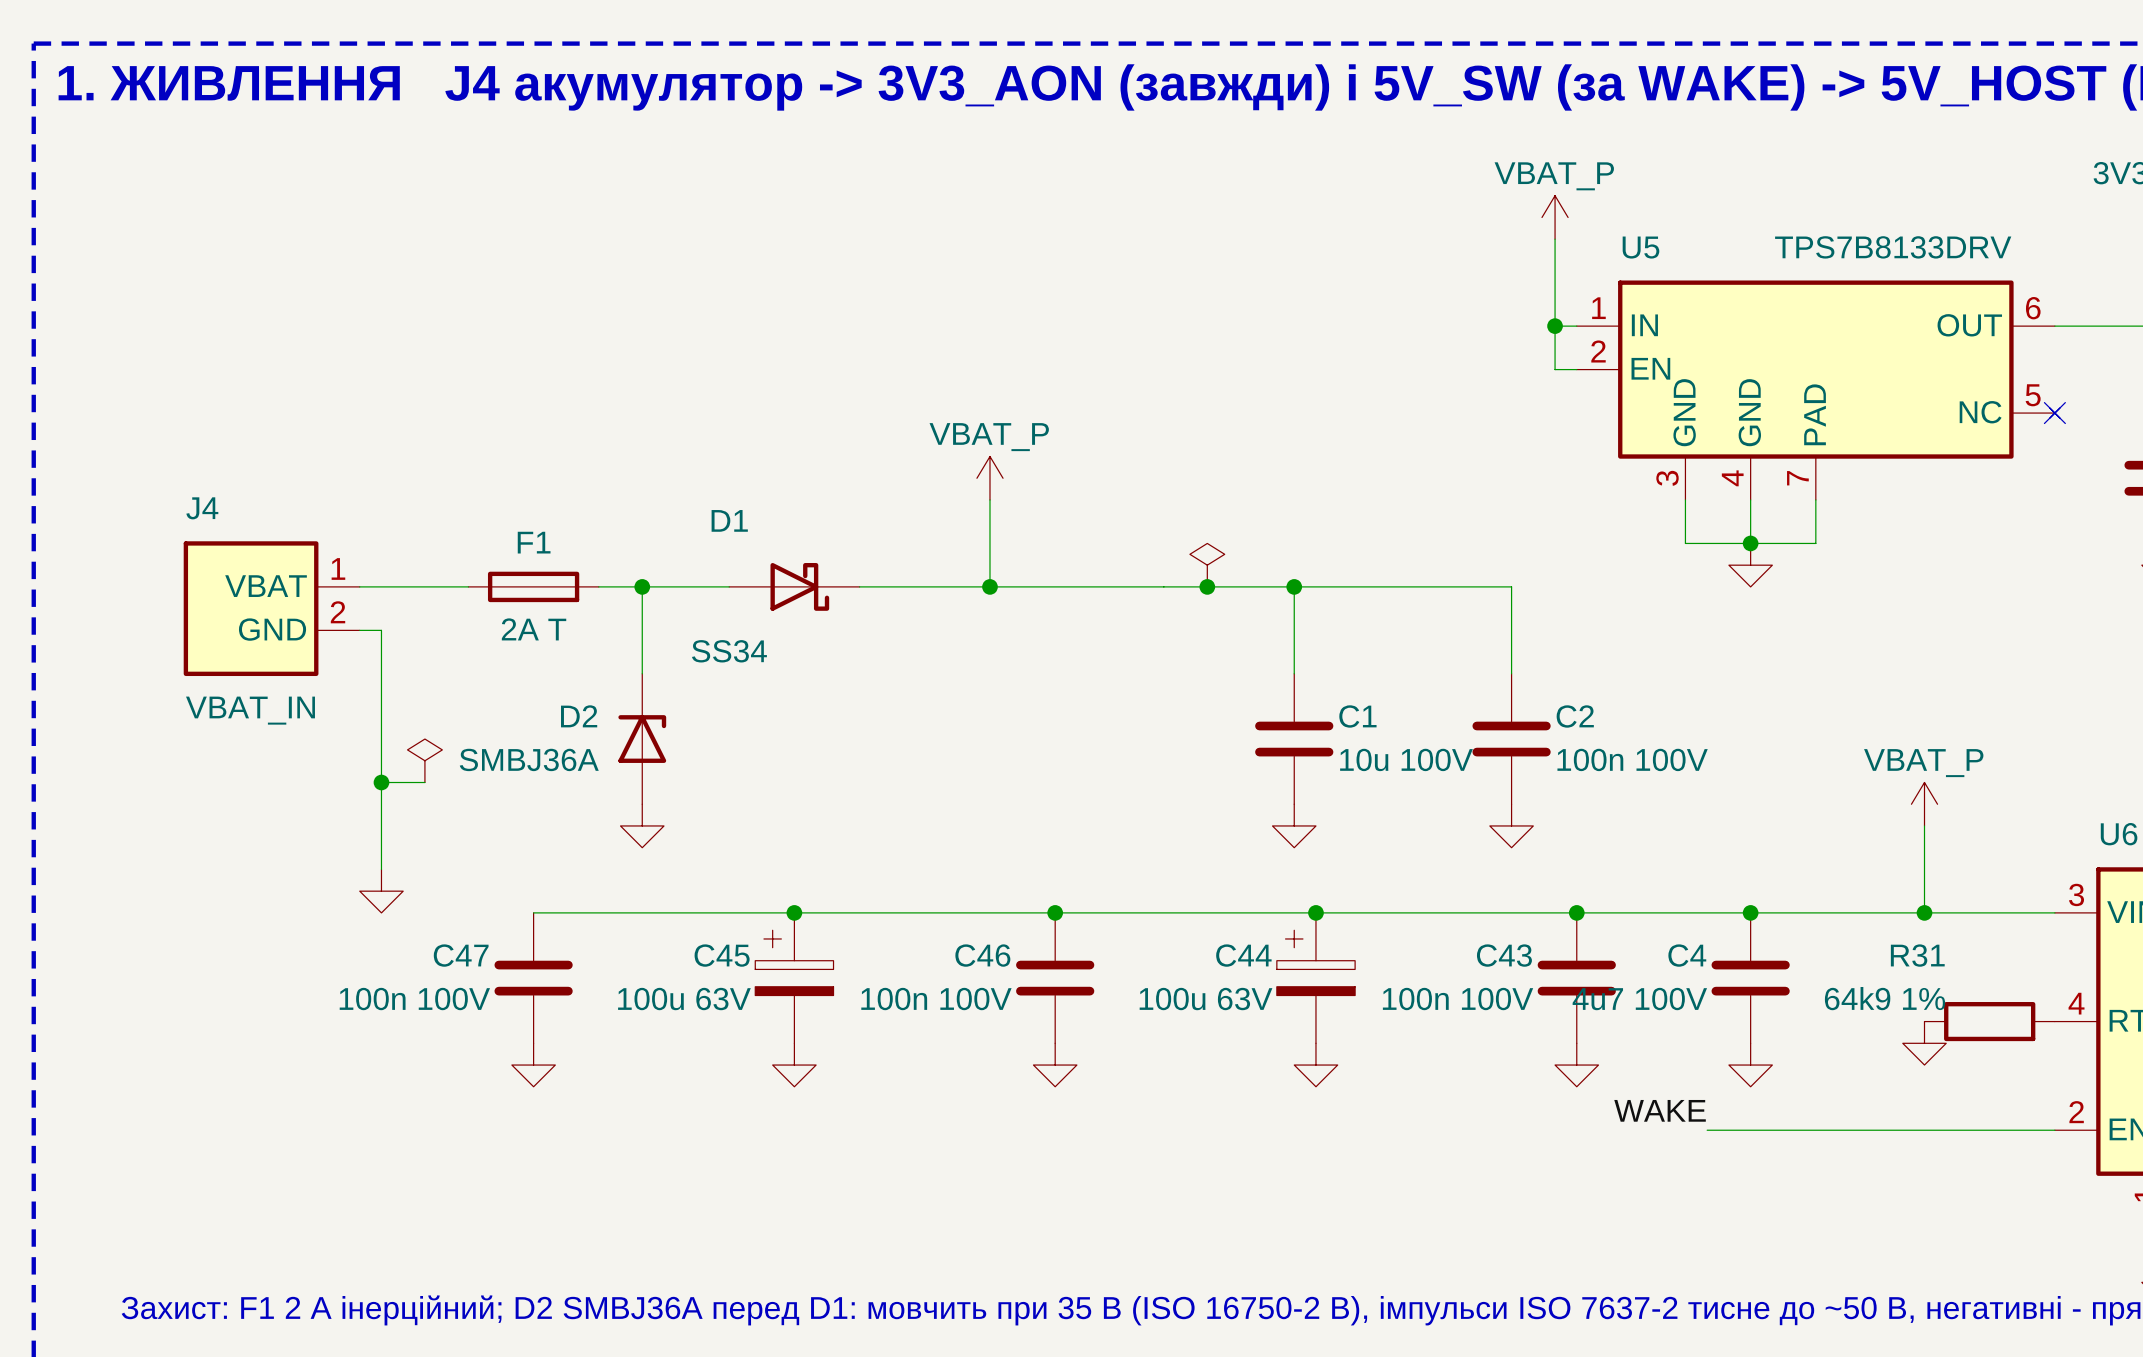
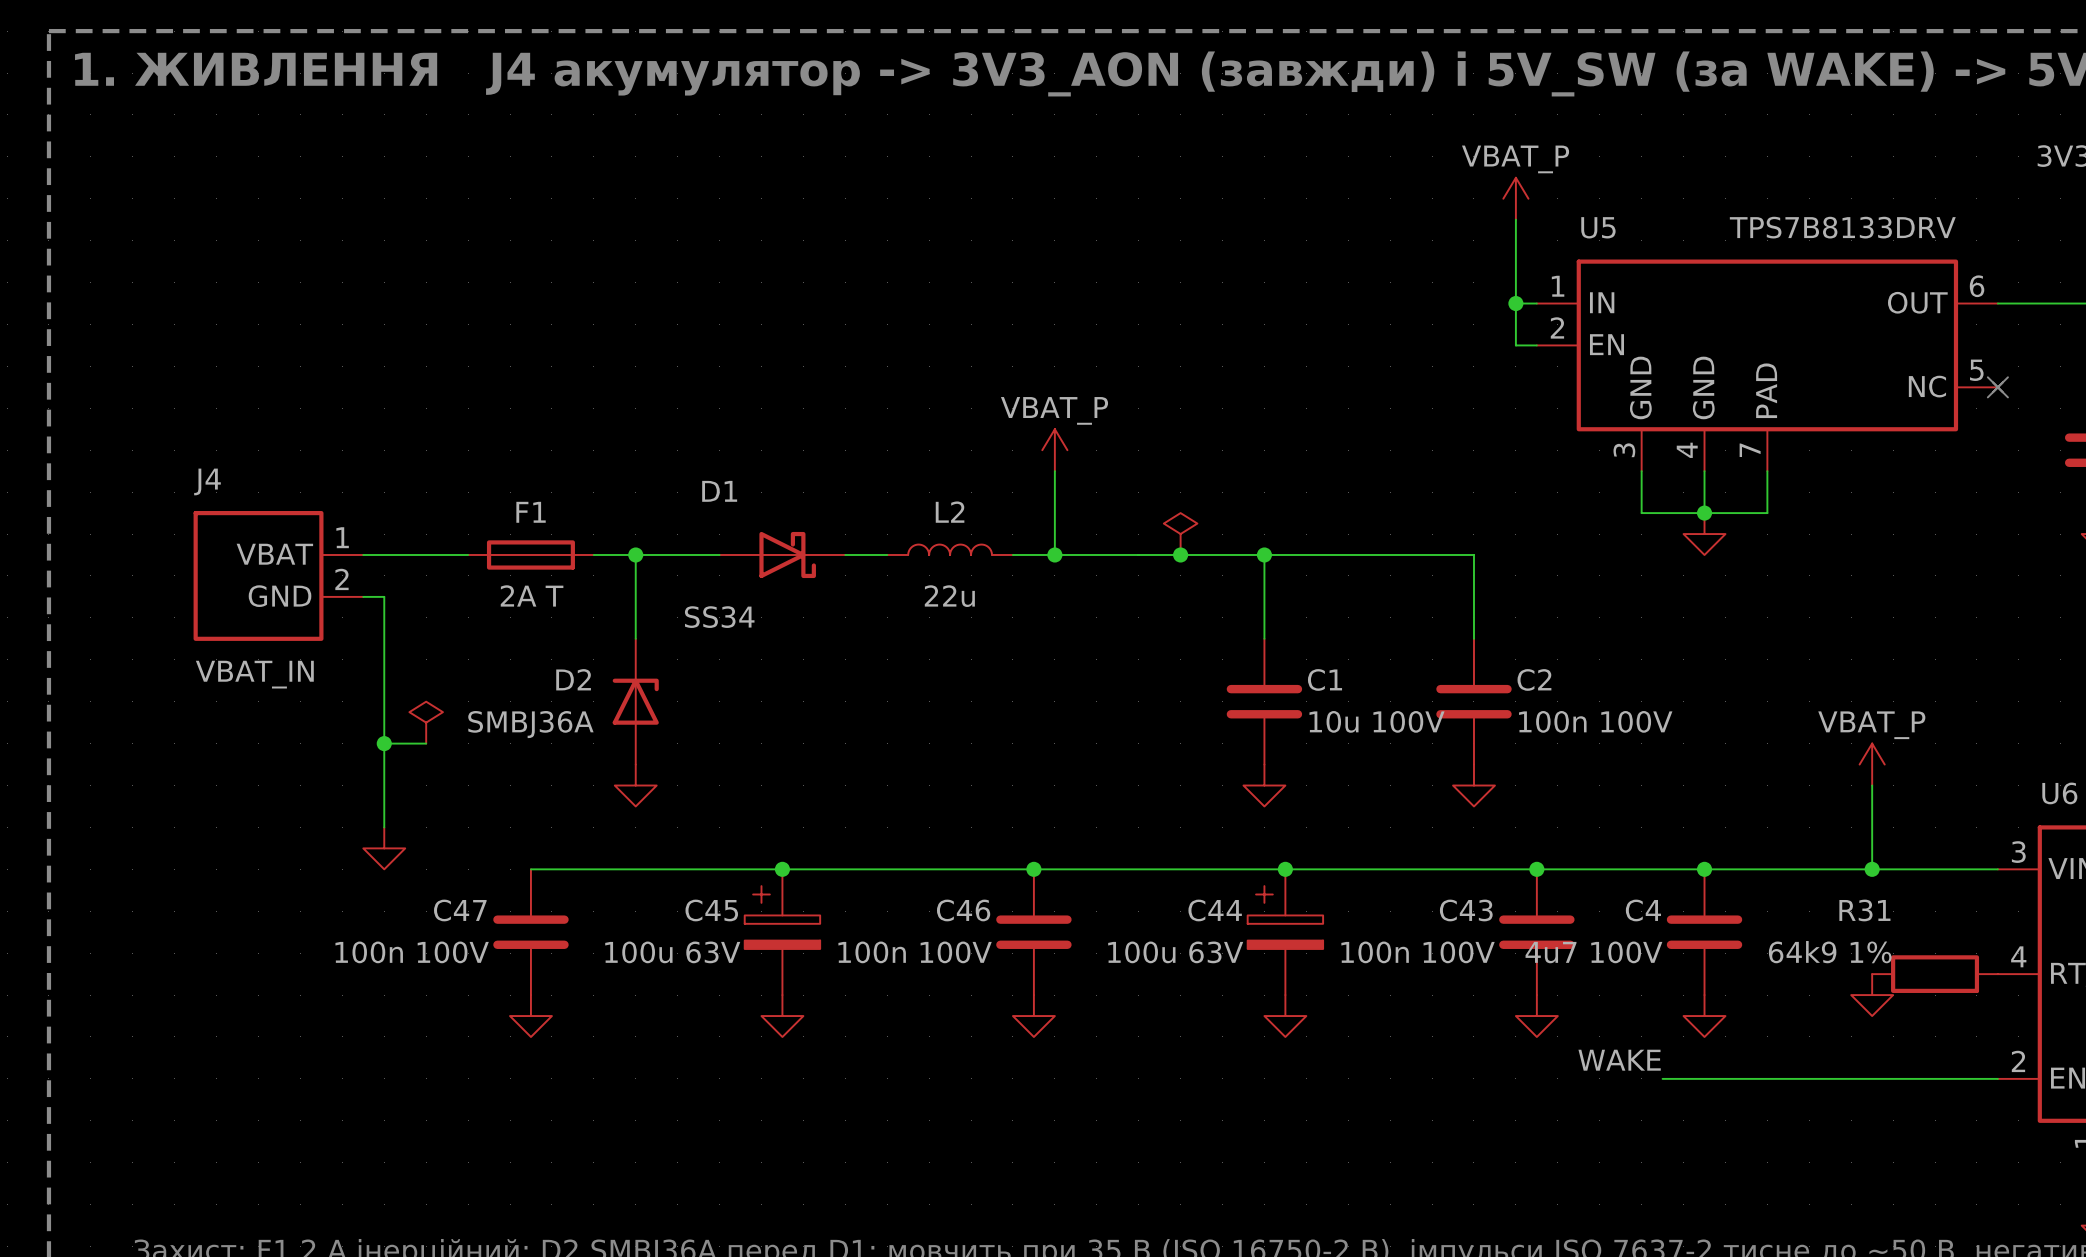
power symbol position: VBAT_P (989, 478) -> VBAT_P (1054, 450)
wire: (989, 499) (989, 586) -> (1054, 471) (1054, 554)
L2: none -> 22u (950, 549)
wire: (903, 586) (1033, 586) -> none
junction position: (989, 586) -> (1054, 554)

